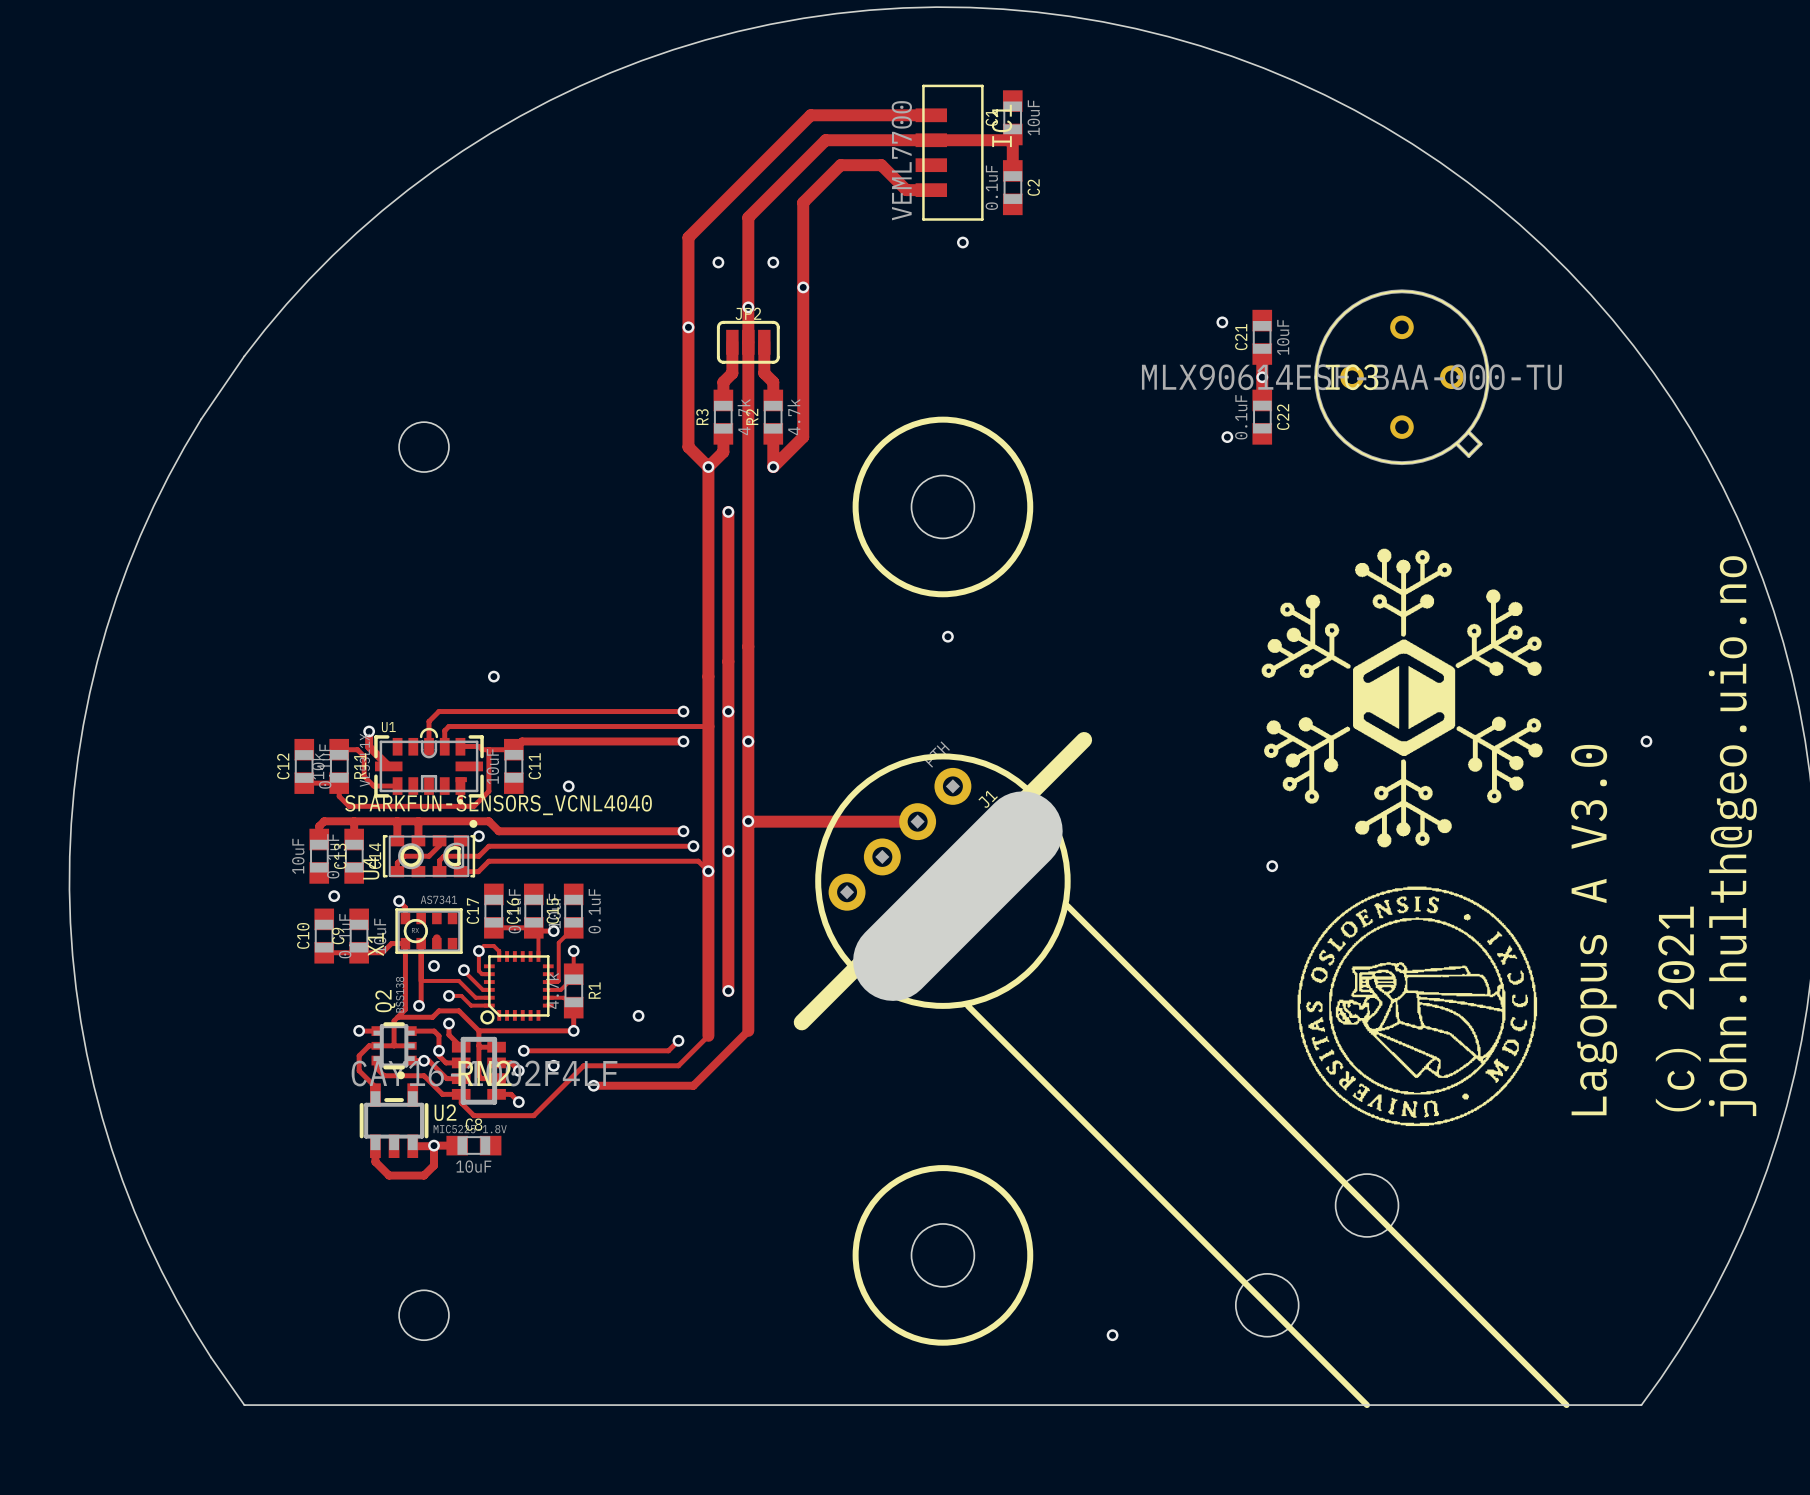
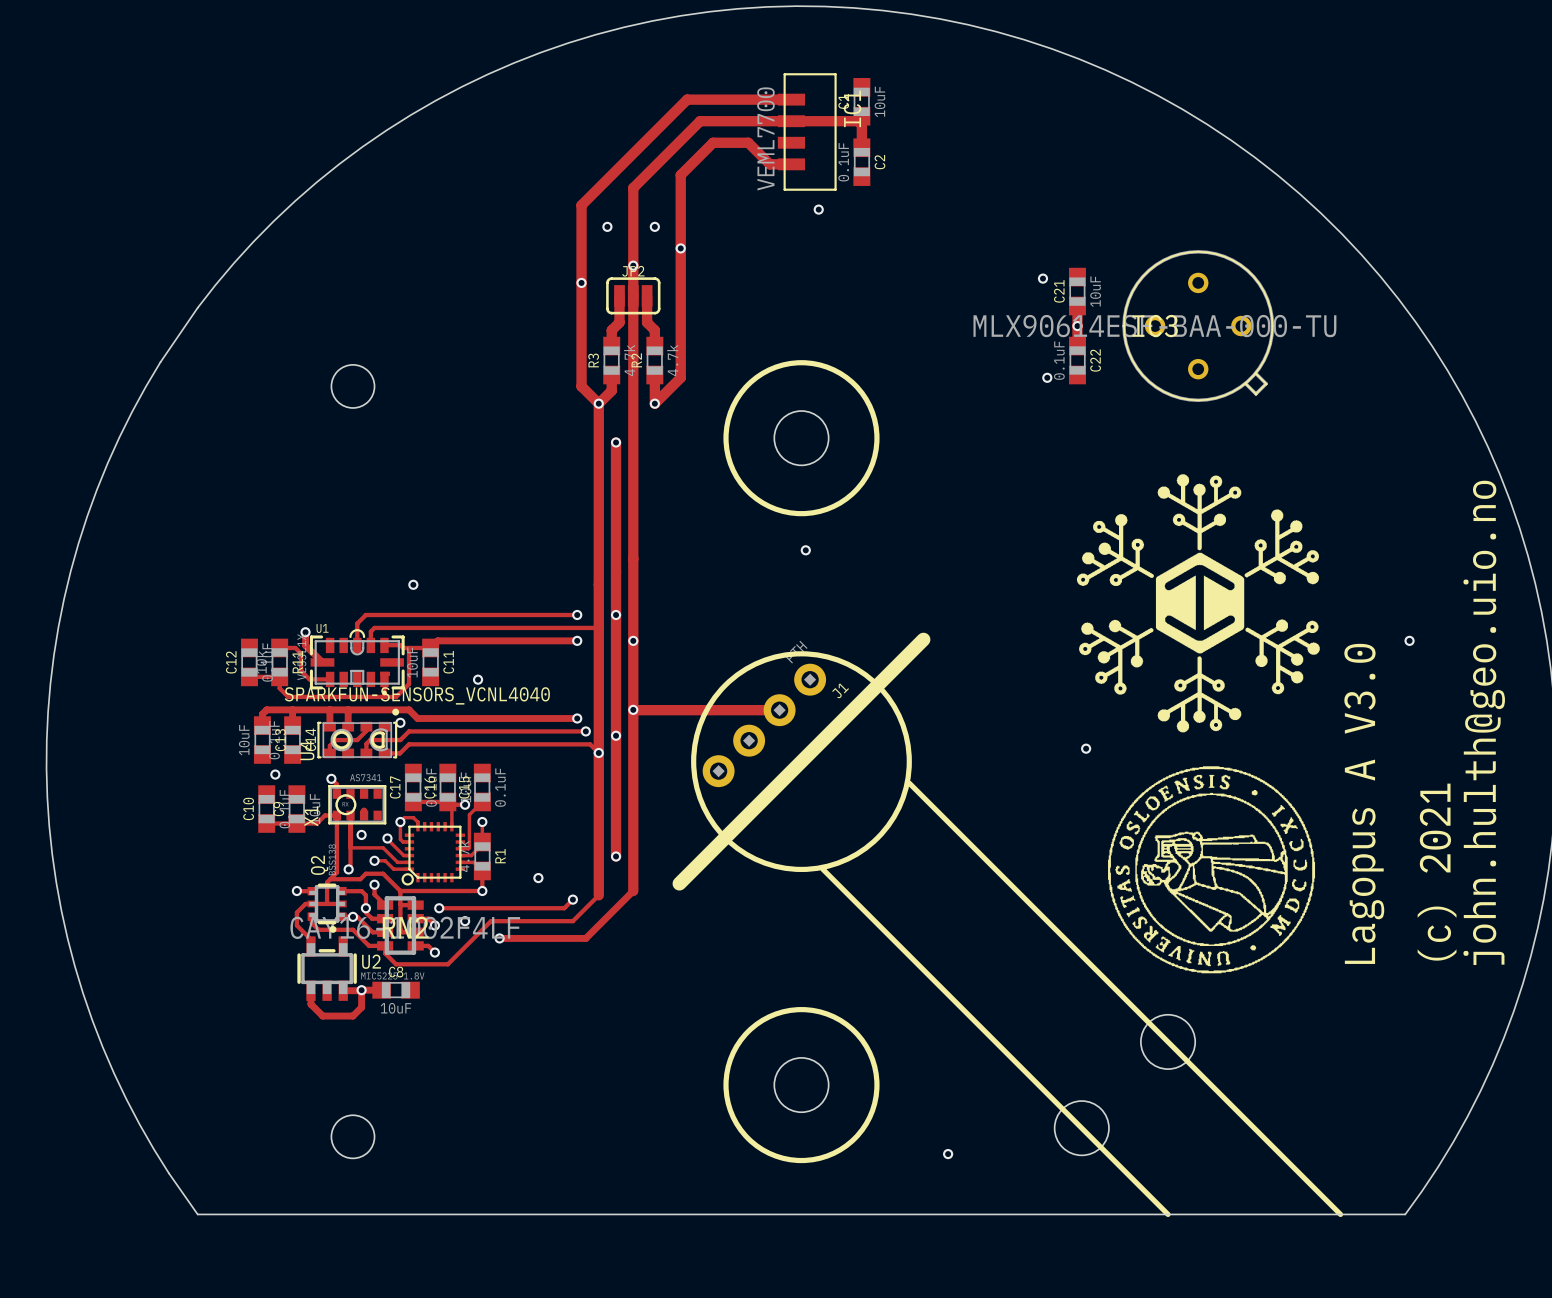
board edge: (1022, 831) (893, 961) -> none

